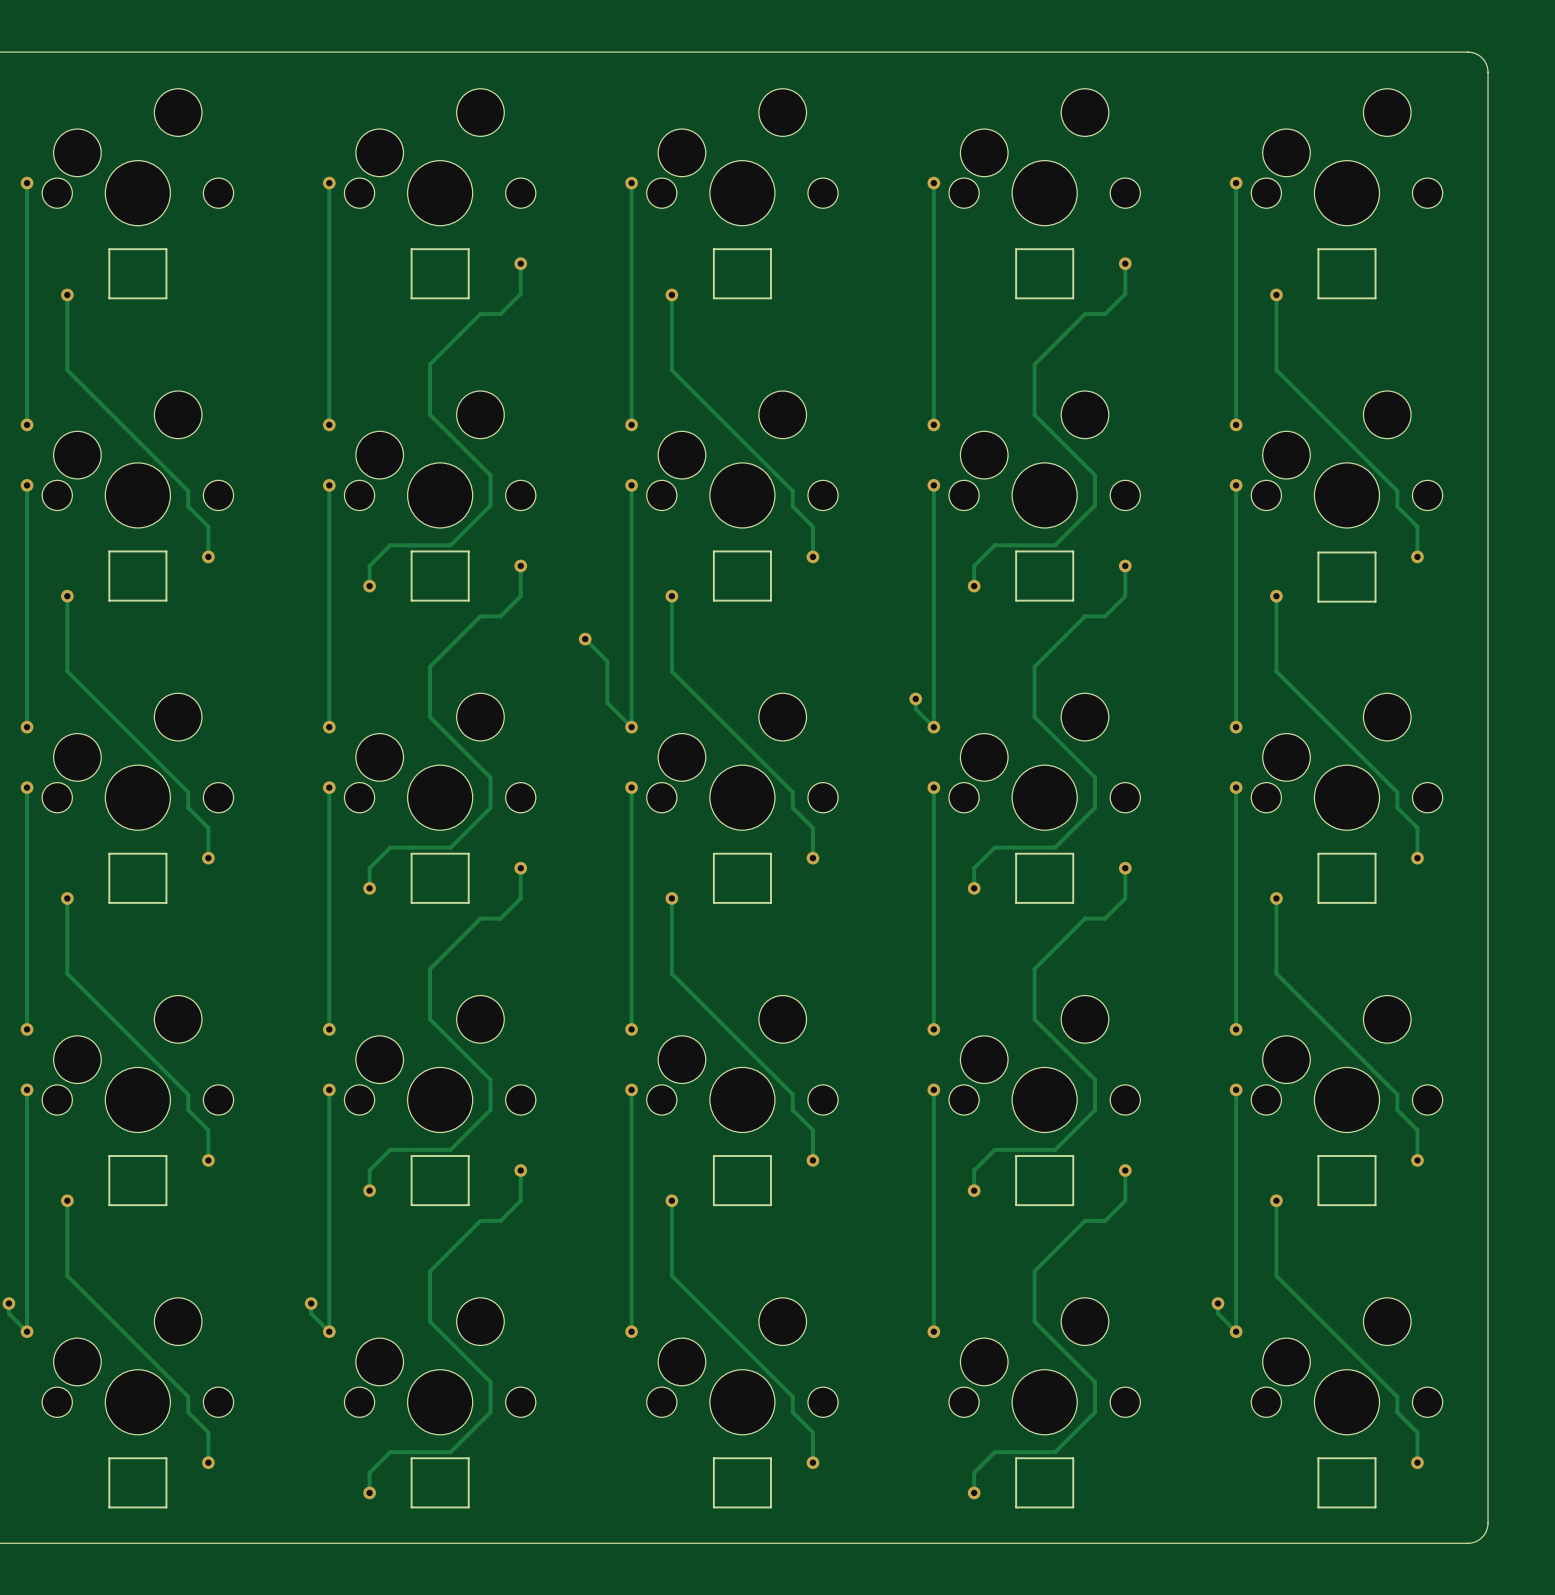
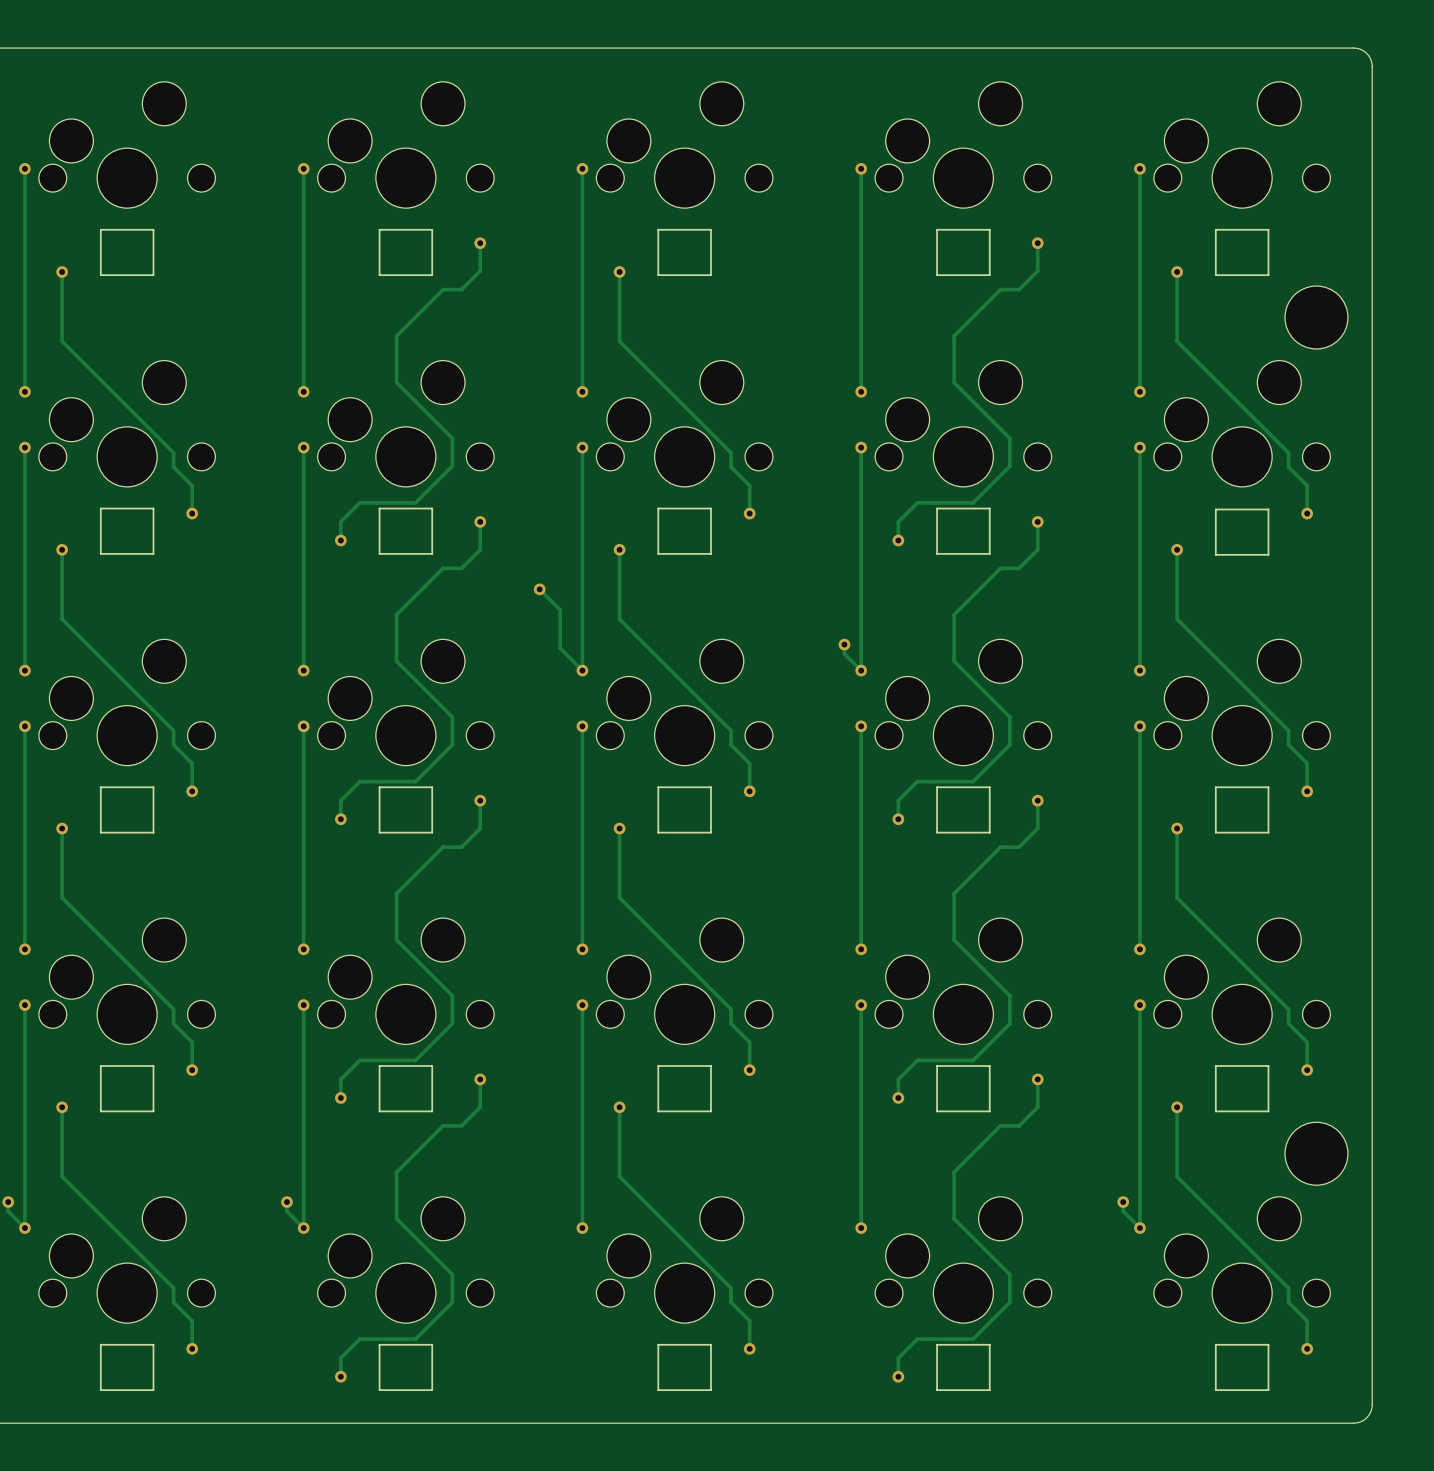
part: none -> (1316, 317)
part: none -> (1316, 1153)

